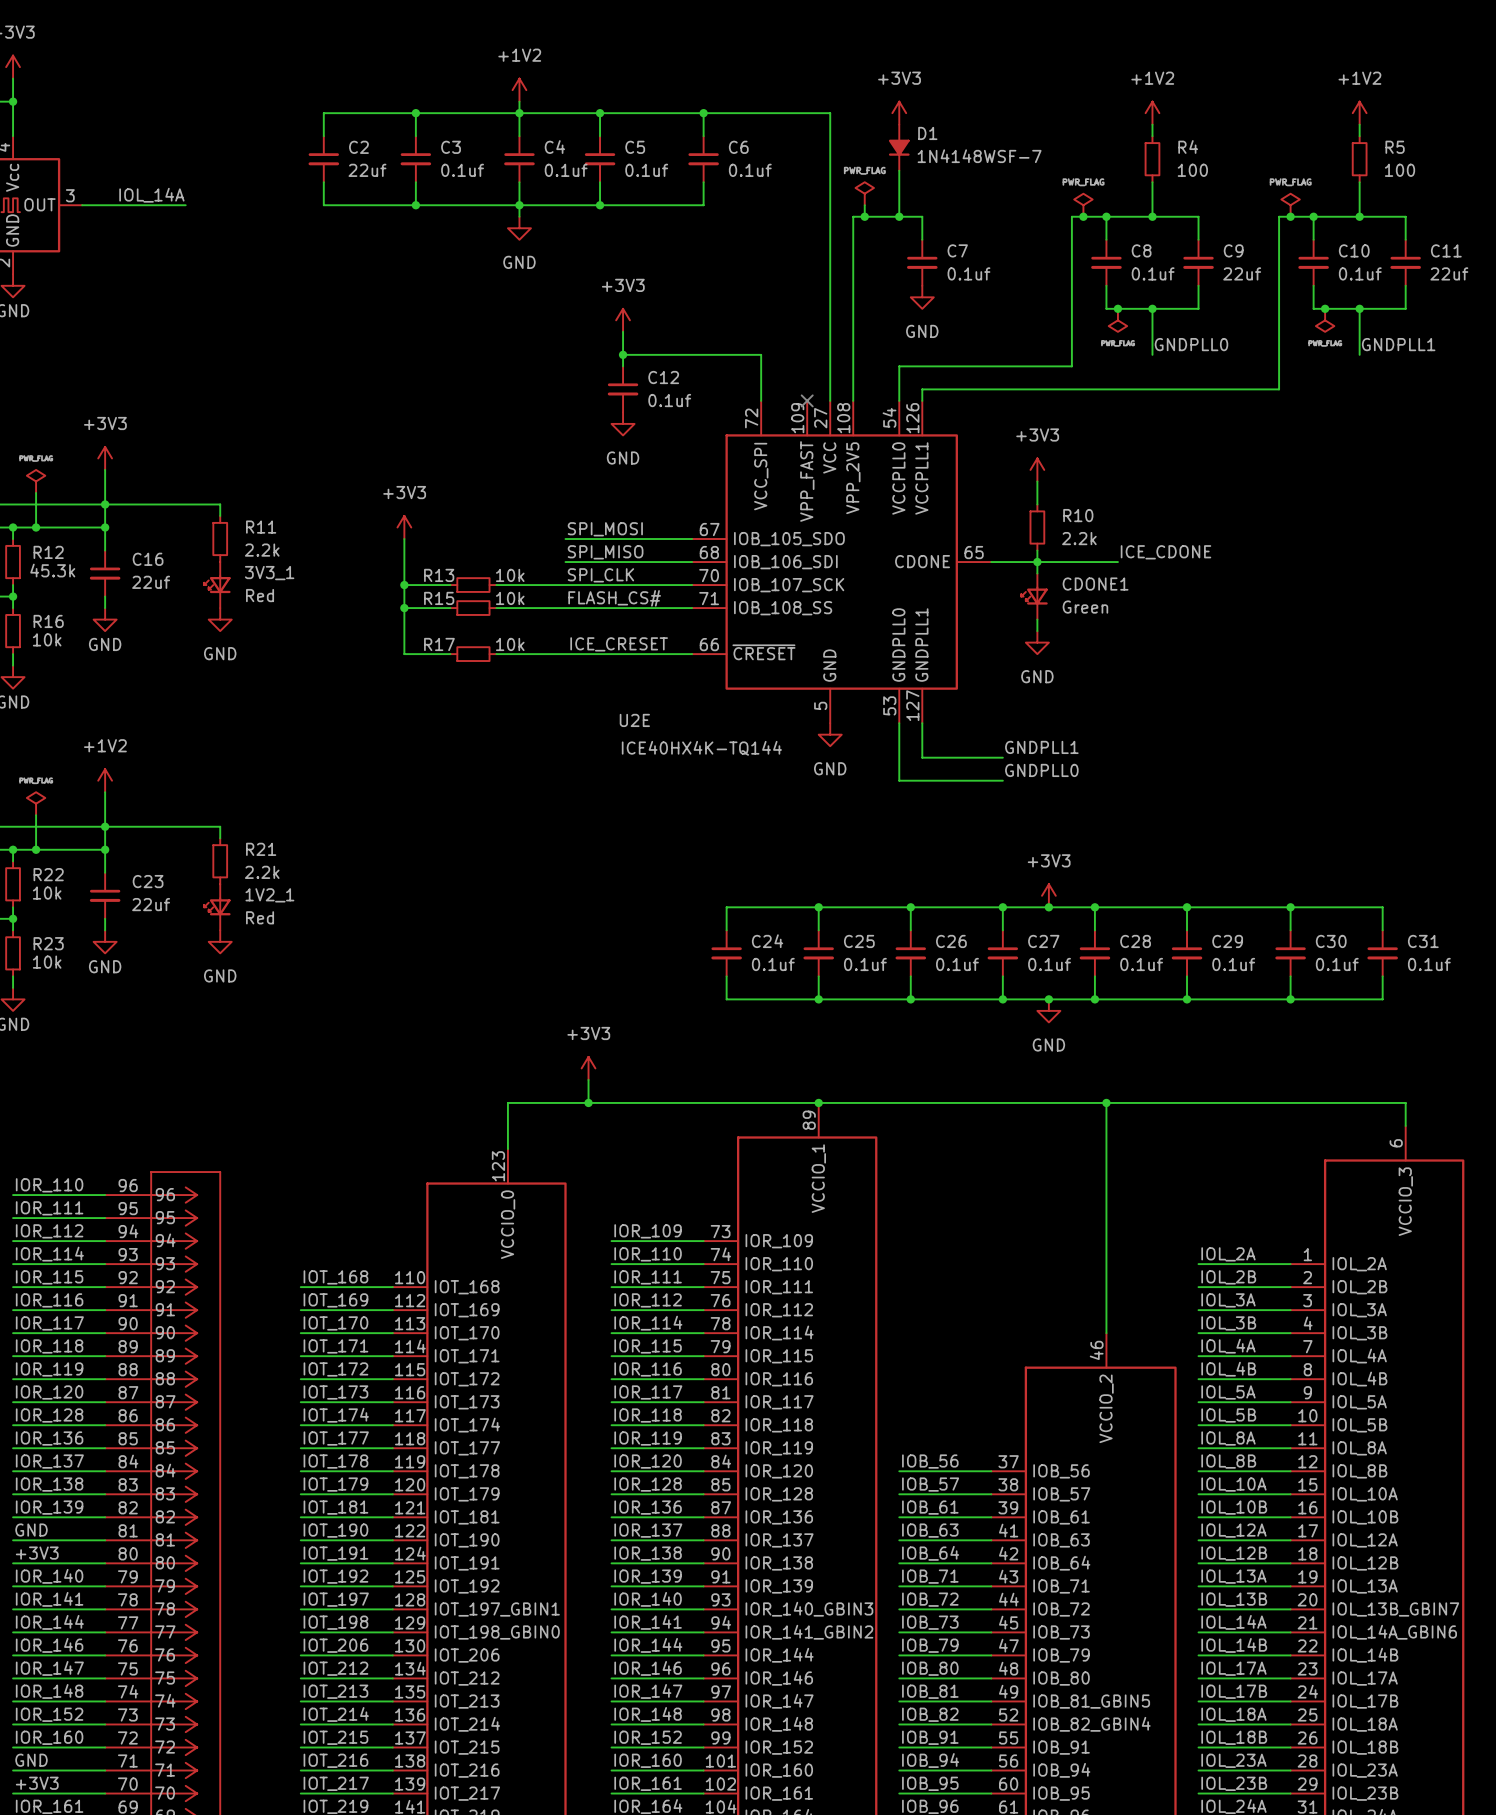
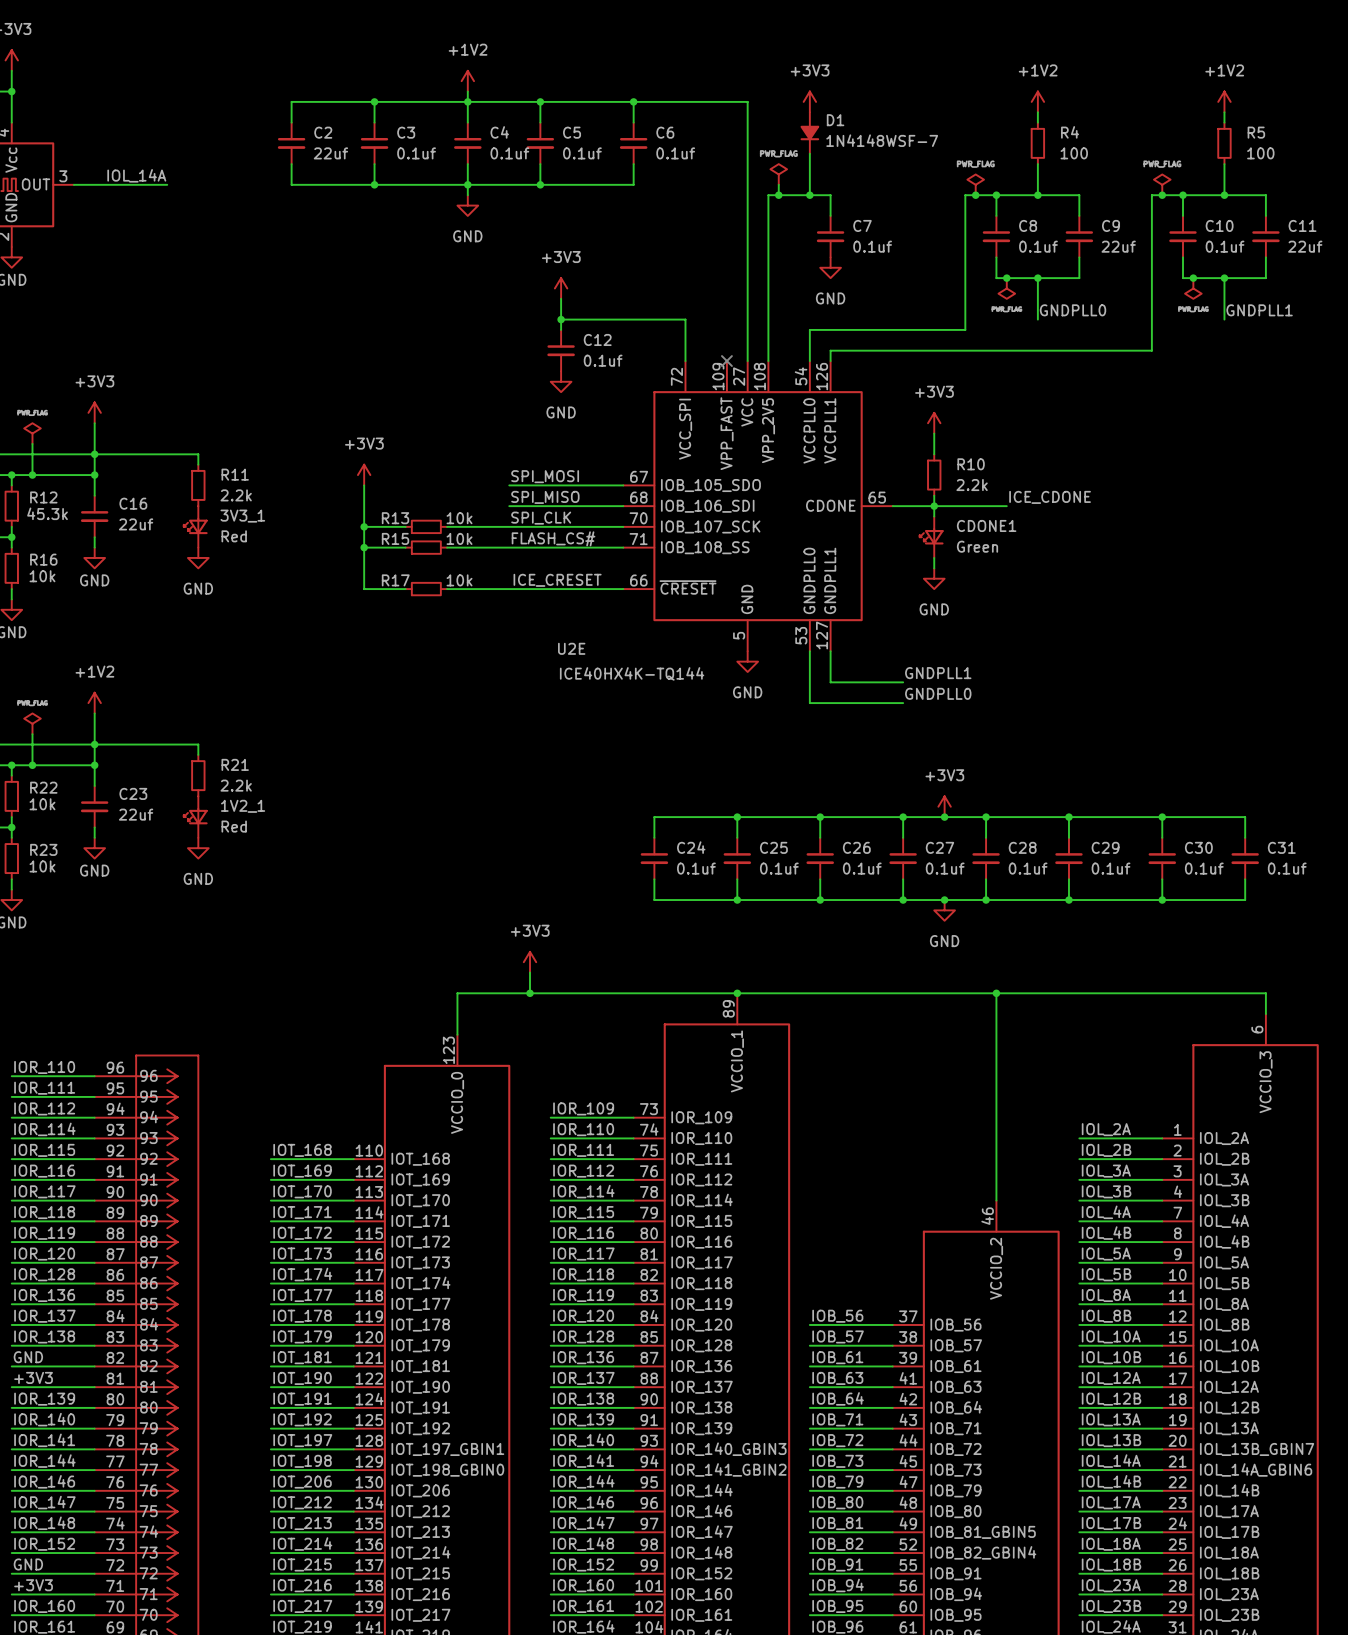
label: IOR_139 (49, 1507) -> GND (28, 1357)
label: GND (31, 1530) -> +3V3 (33, 1377)
label: +3V3 (37, 1553) -> IOR_139 (44, 1399)
label: IOR_160 (49, 1737) -> GND (28, 1564)
label: GND (31, 1760) -> +3V3 (33, 1585)
label: +3V3 (37, 1783) -> IOR_160 (44, 1606)

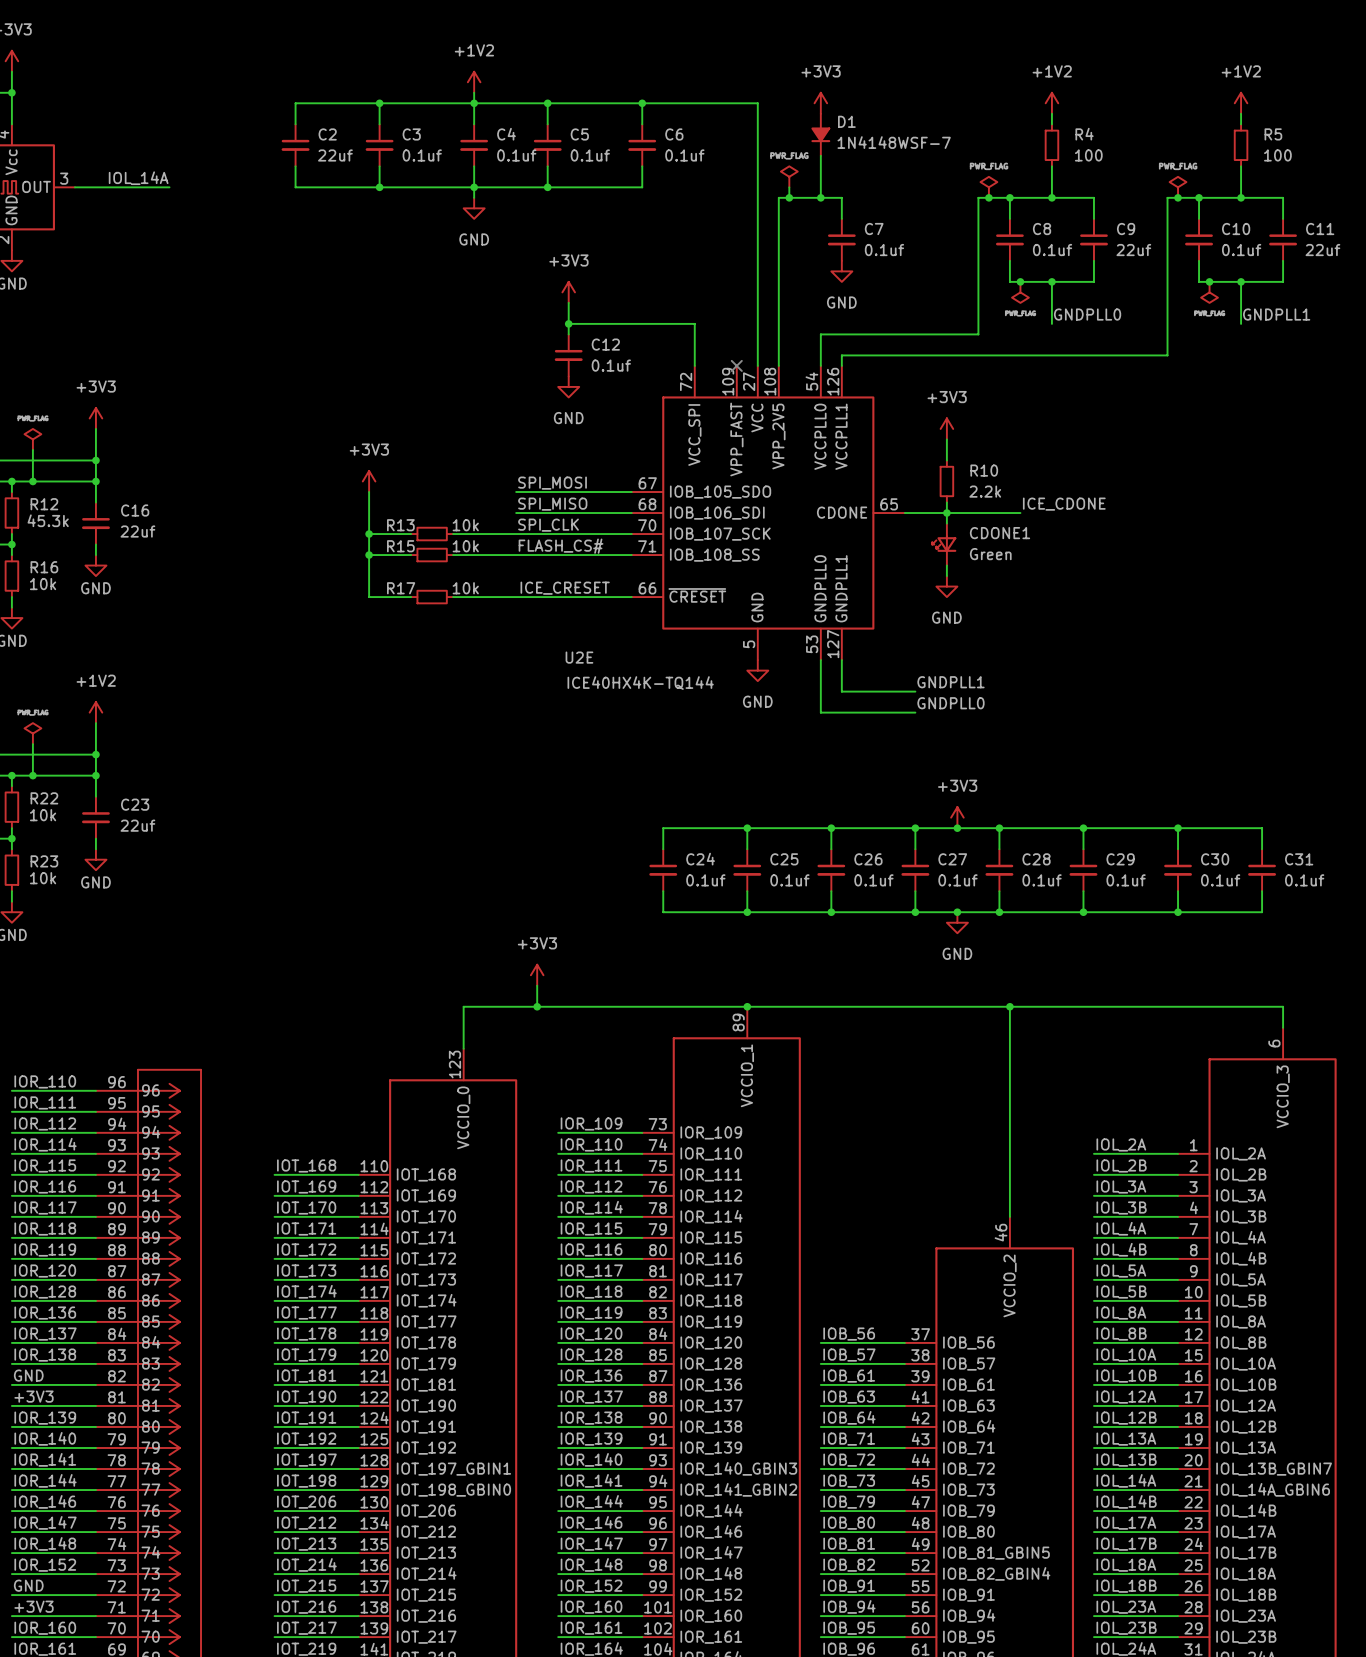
wire: (94, 454) (198, 454) (198, 464) -> none
R11: 2.2k (198, 485) -> none
3V3_1: Red (195, 526) -> none
power symbol: GND (198, 557) -> none
wire: (94, 744) (198, 744) (198, 754) -> none
R21: 2.2k (198, 775) -> none
1V2_1: Red (195, 817) -> none
power symbol: GND (198, 848) -> none

